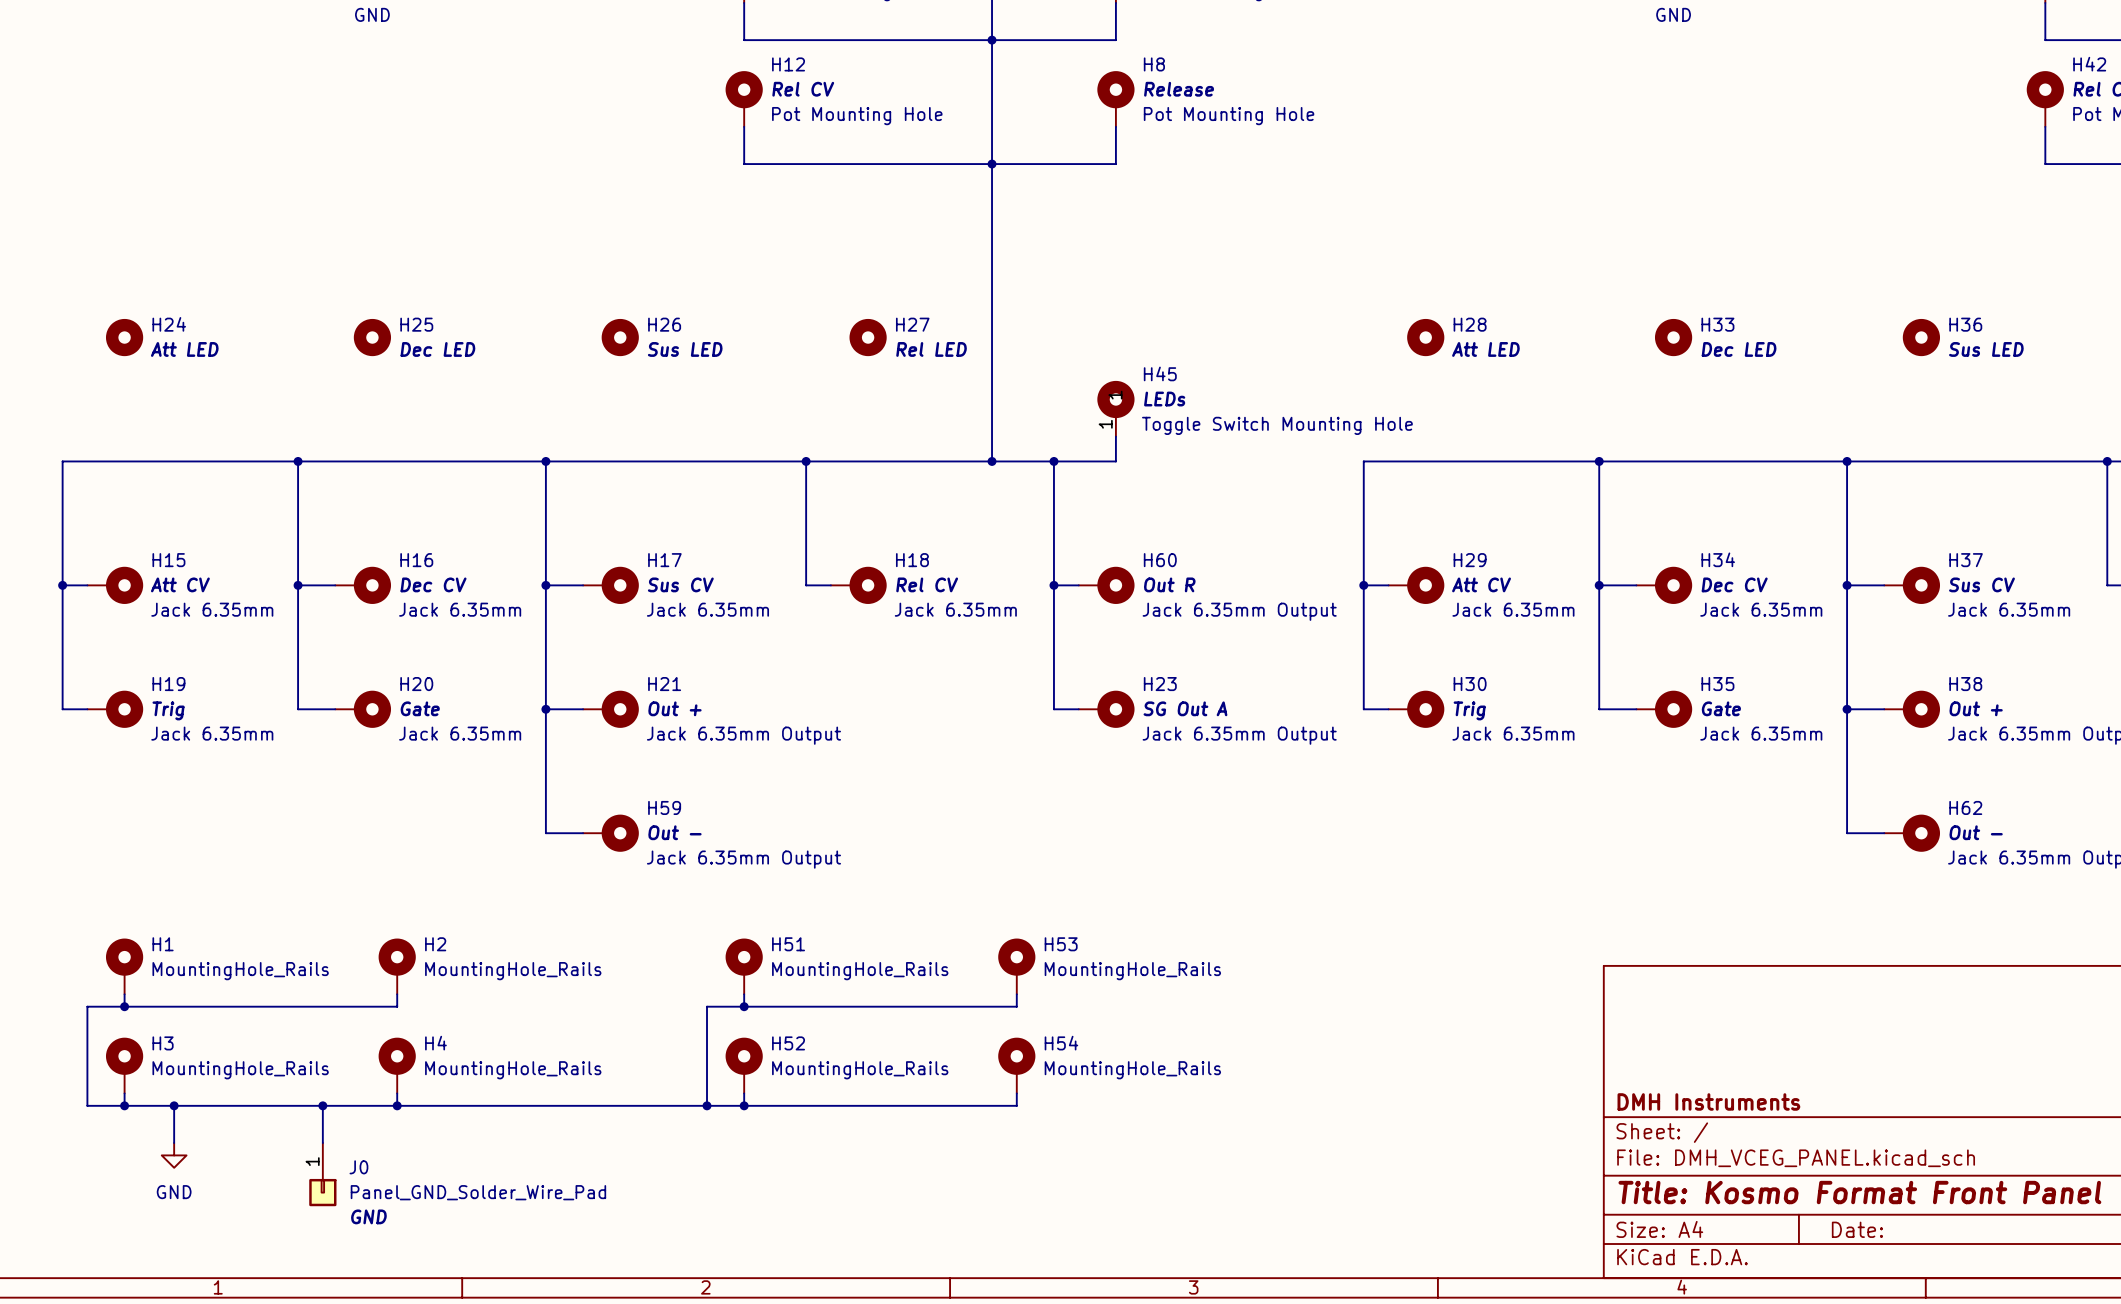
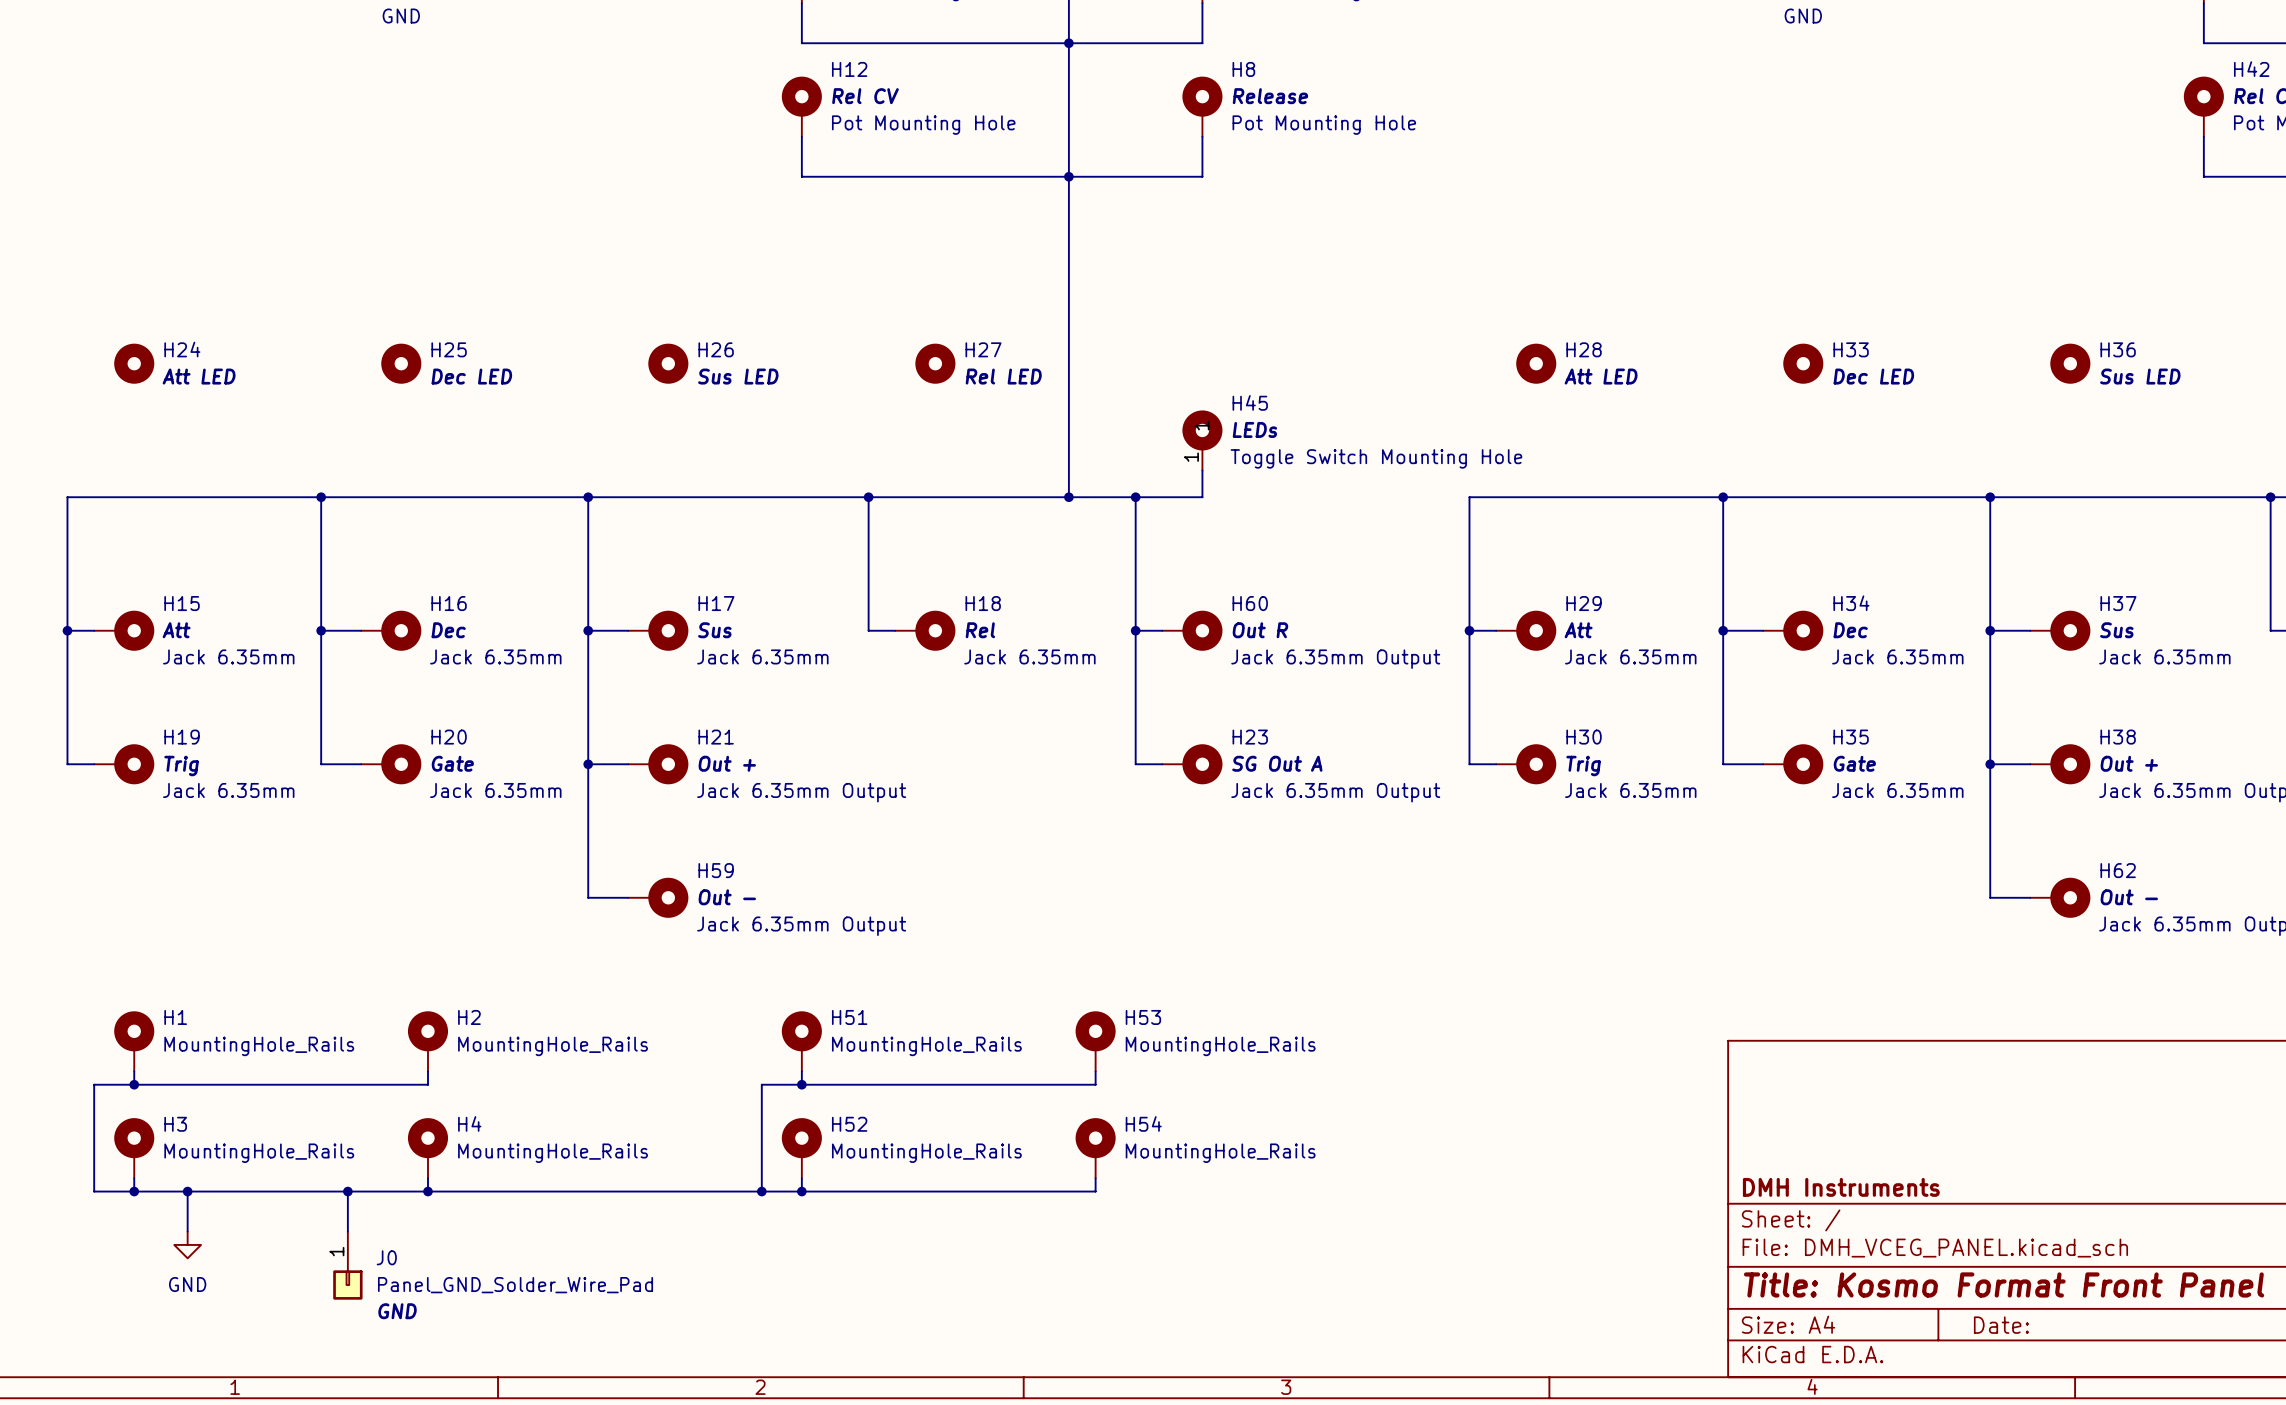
H15 value: Att CV (180, 584) -> Att (176, 630)
H16 value: Dec CV (433, 584) -> Dec (448, 630)
H17 value: Sus CV (680, 584) -> Sus (714, 630)
H18 value: Rel CV (927, 584) -> Rel (980, 630)
H29 value: Att CV (1481, 584) -> Att (1578, 630)
H34 value: Dec CV (1734, 584) -> Dec (1850, 630)
H37 value: Sus CV (1981, 584) -> Sus (2116, 630)

